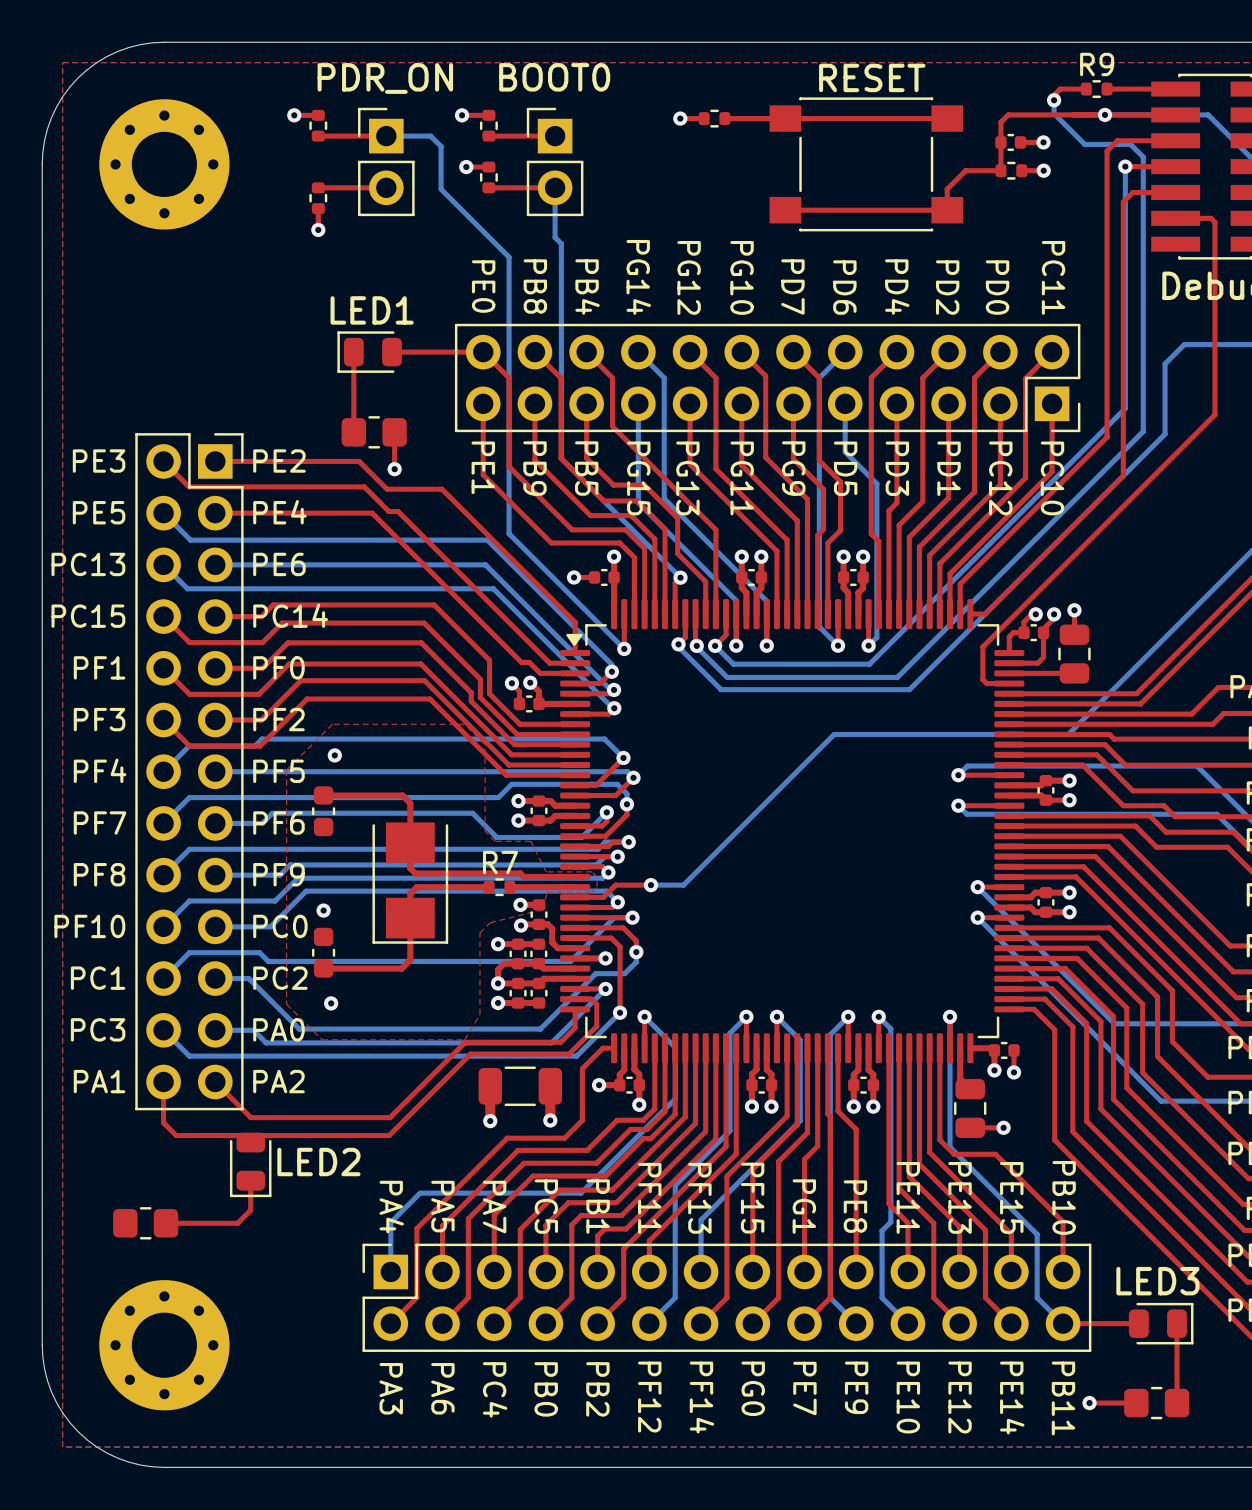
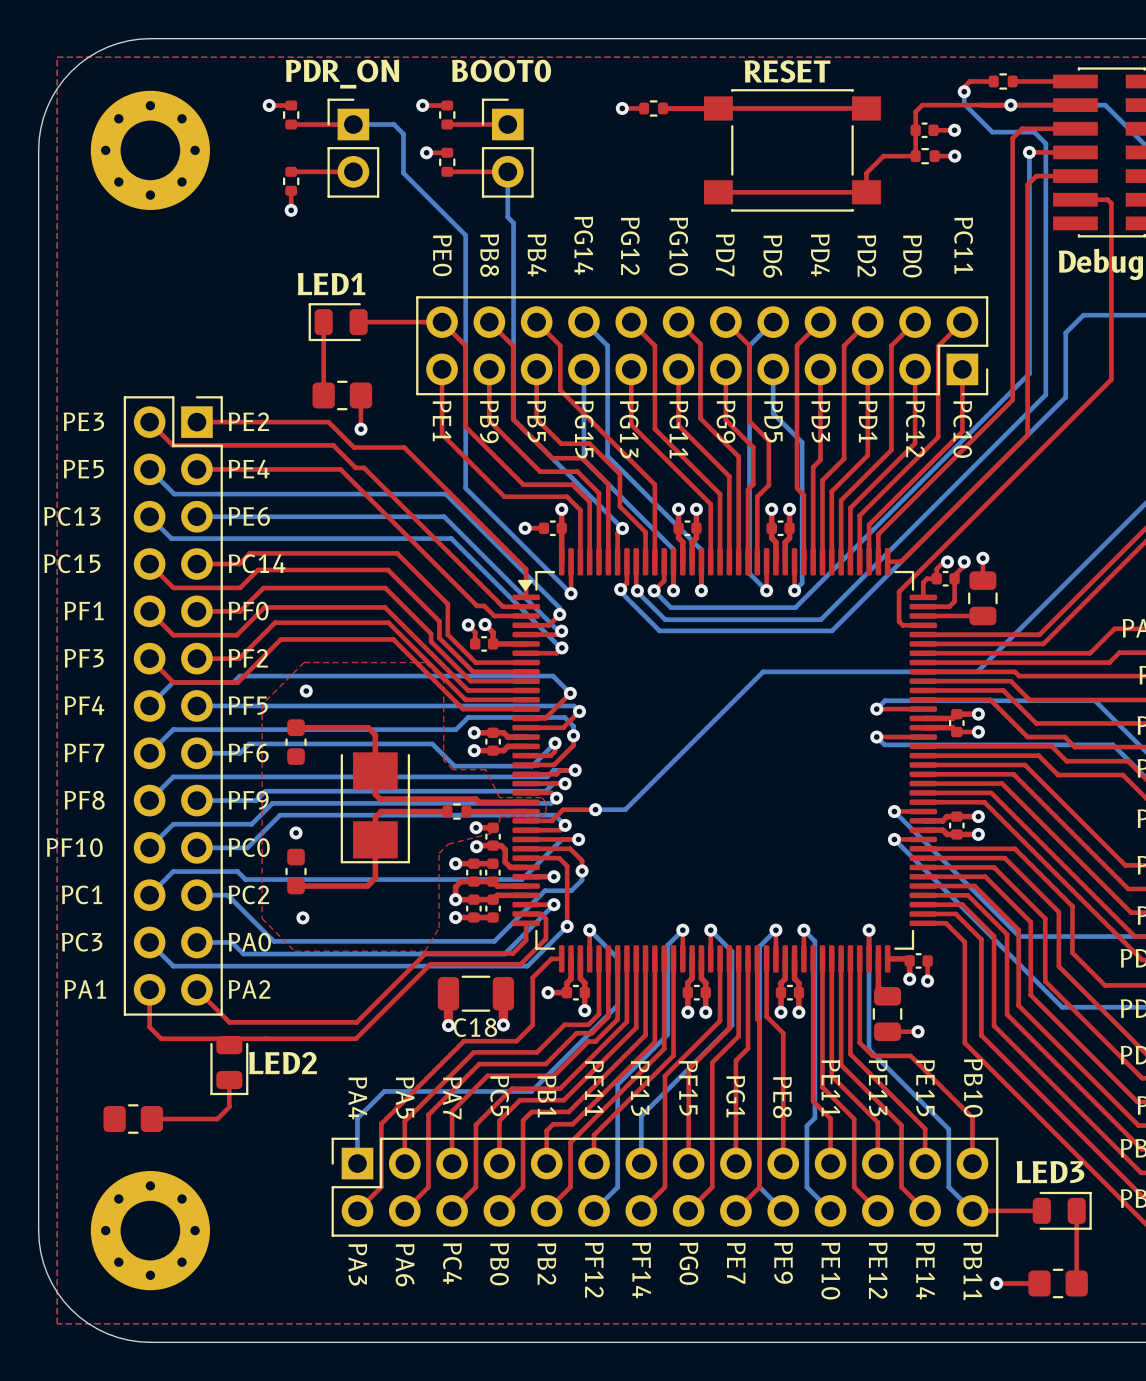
R9 name: R9 (1097, 64) -> none
R7 name: R7 (500, 862) -> none
C18 name: none -> C18 (475, 1027)

